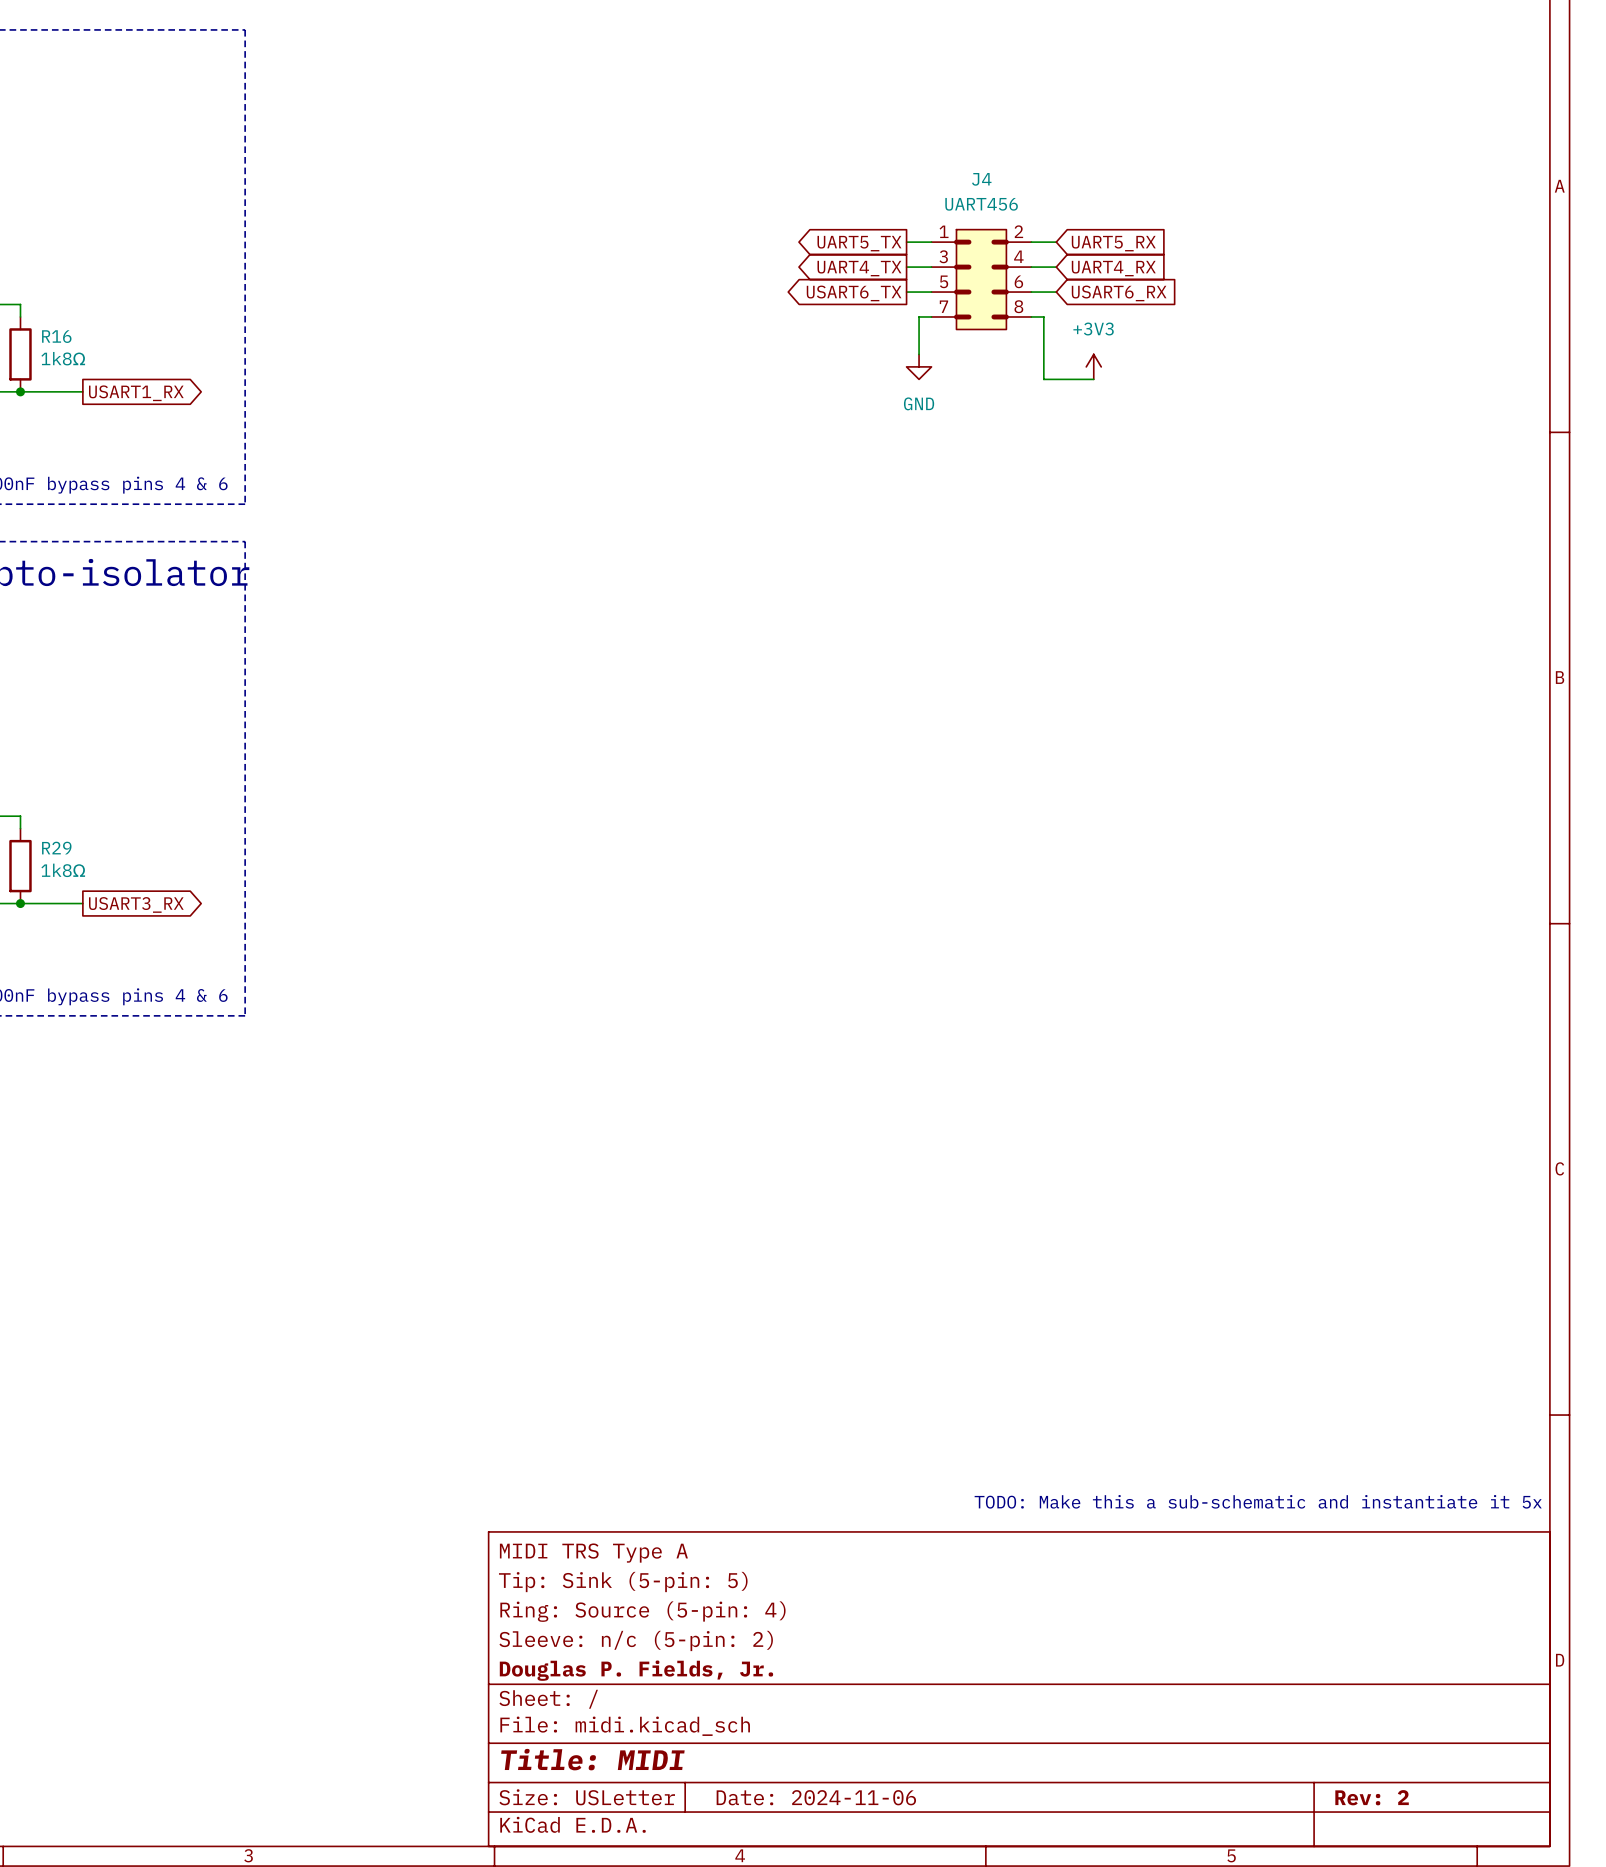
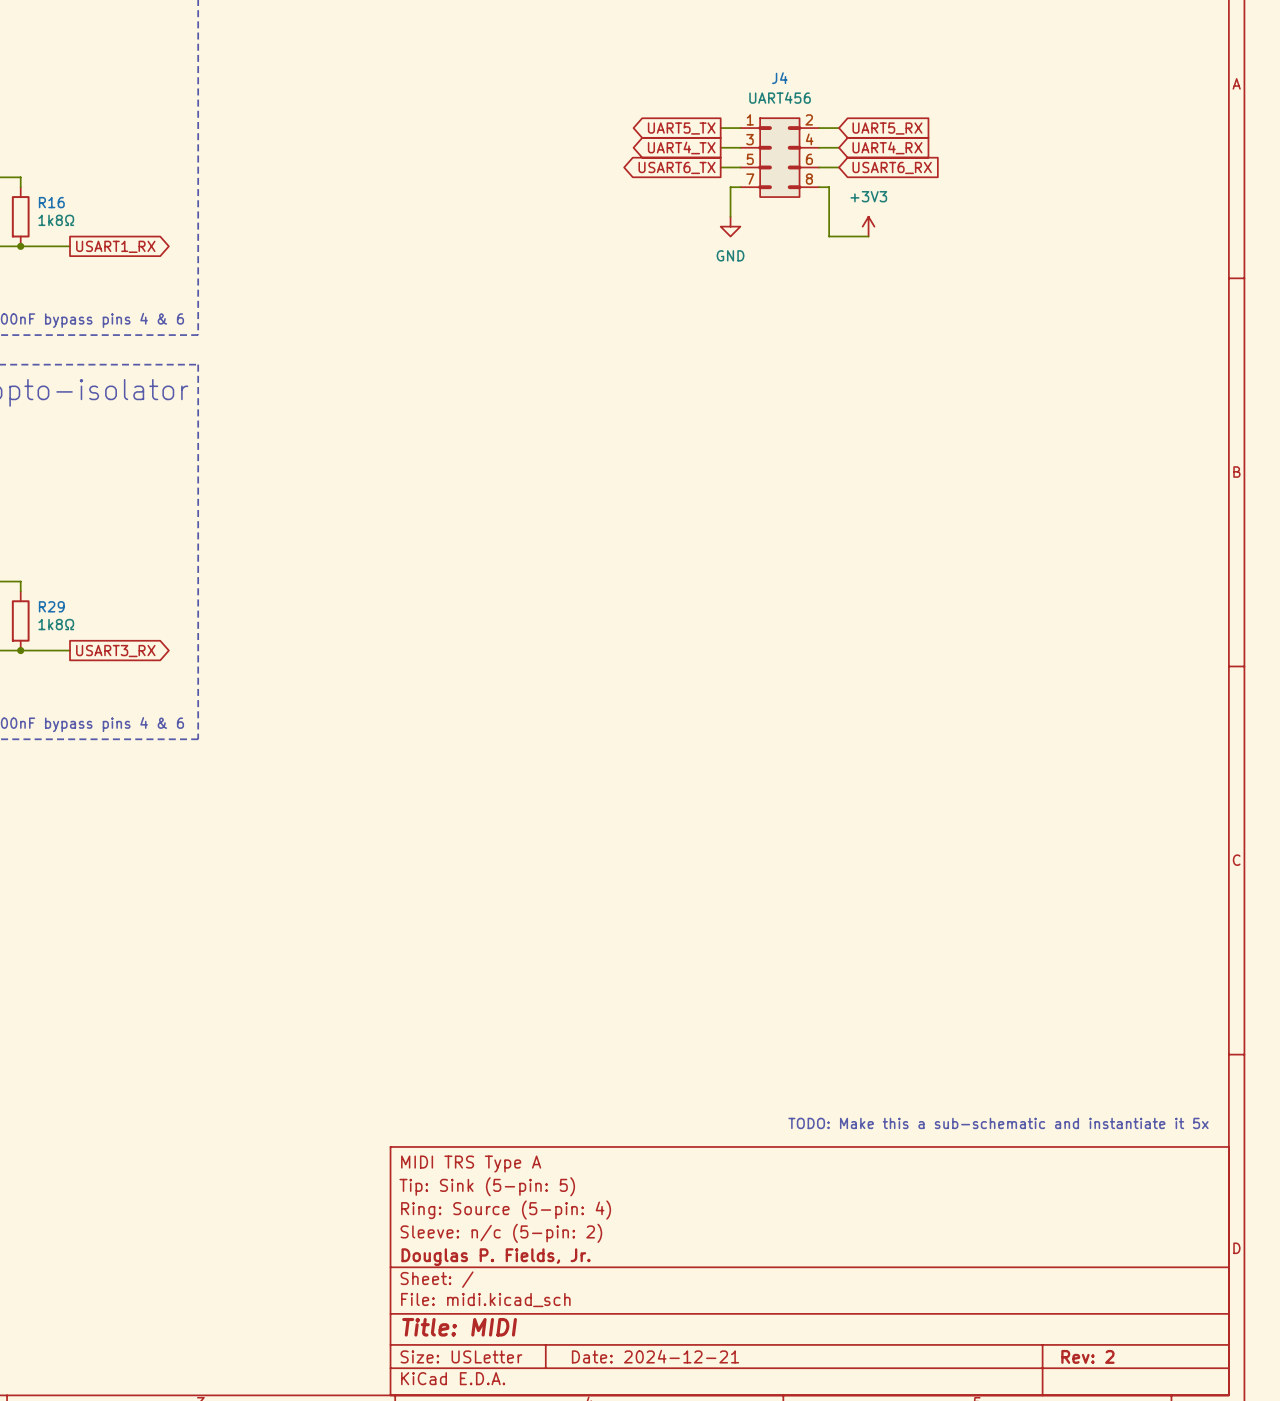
title block: Date: 2024-11-06 (816, 1797) -> Date: 2024-12-21 (655, 1356)

